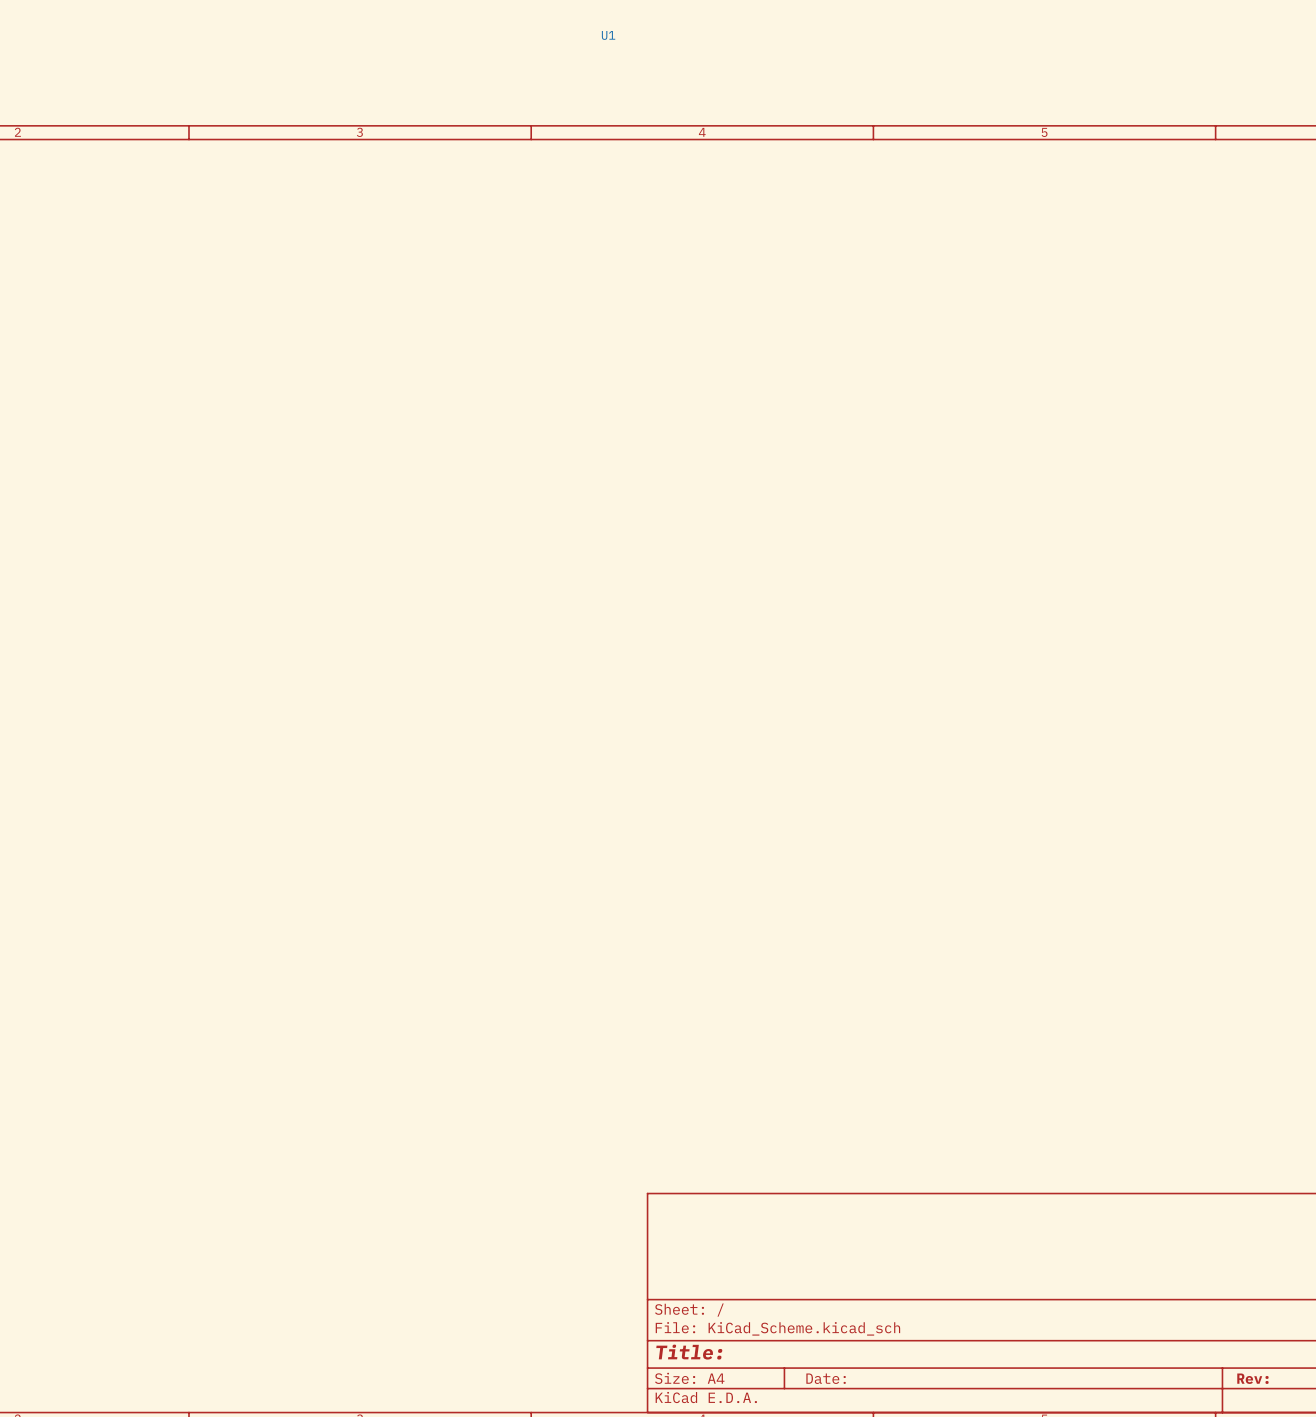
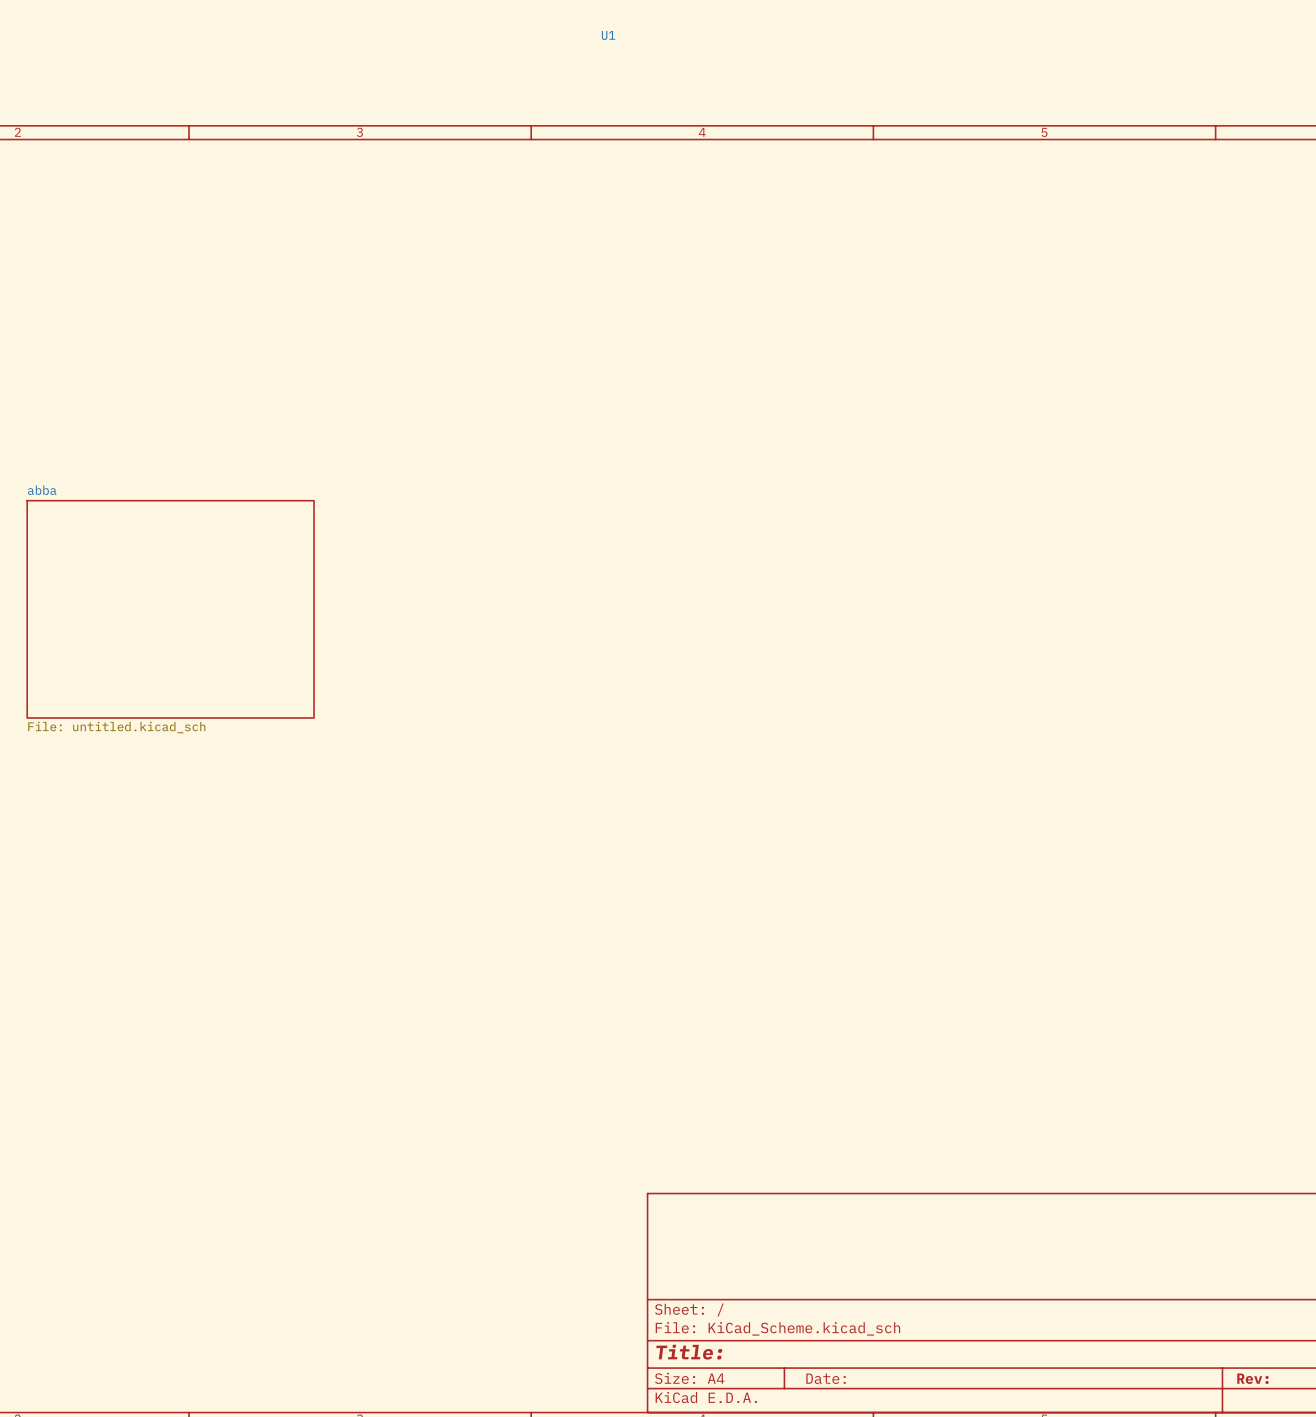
sheet abba: none -> File: untitled.kicad_sch (170, 609)

